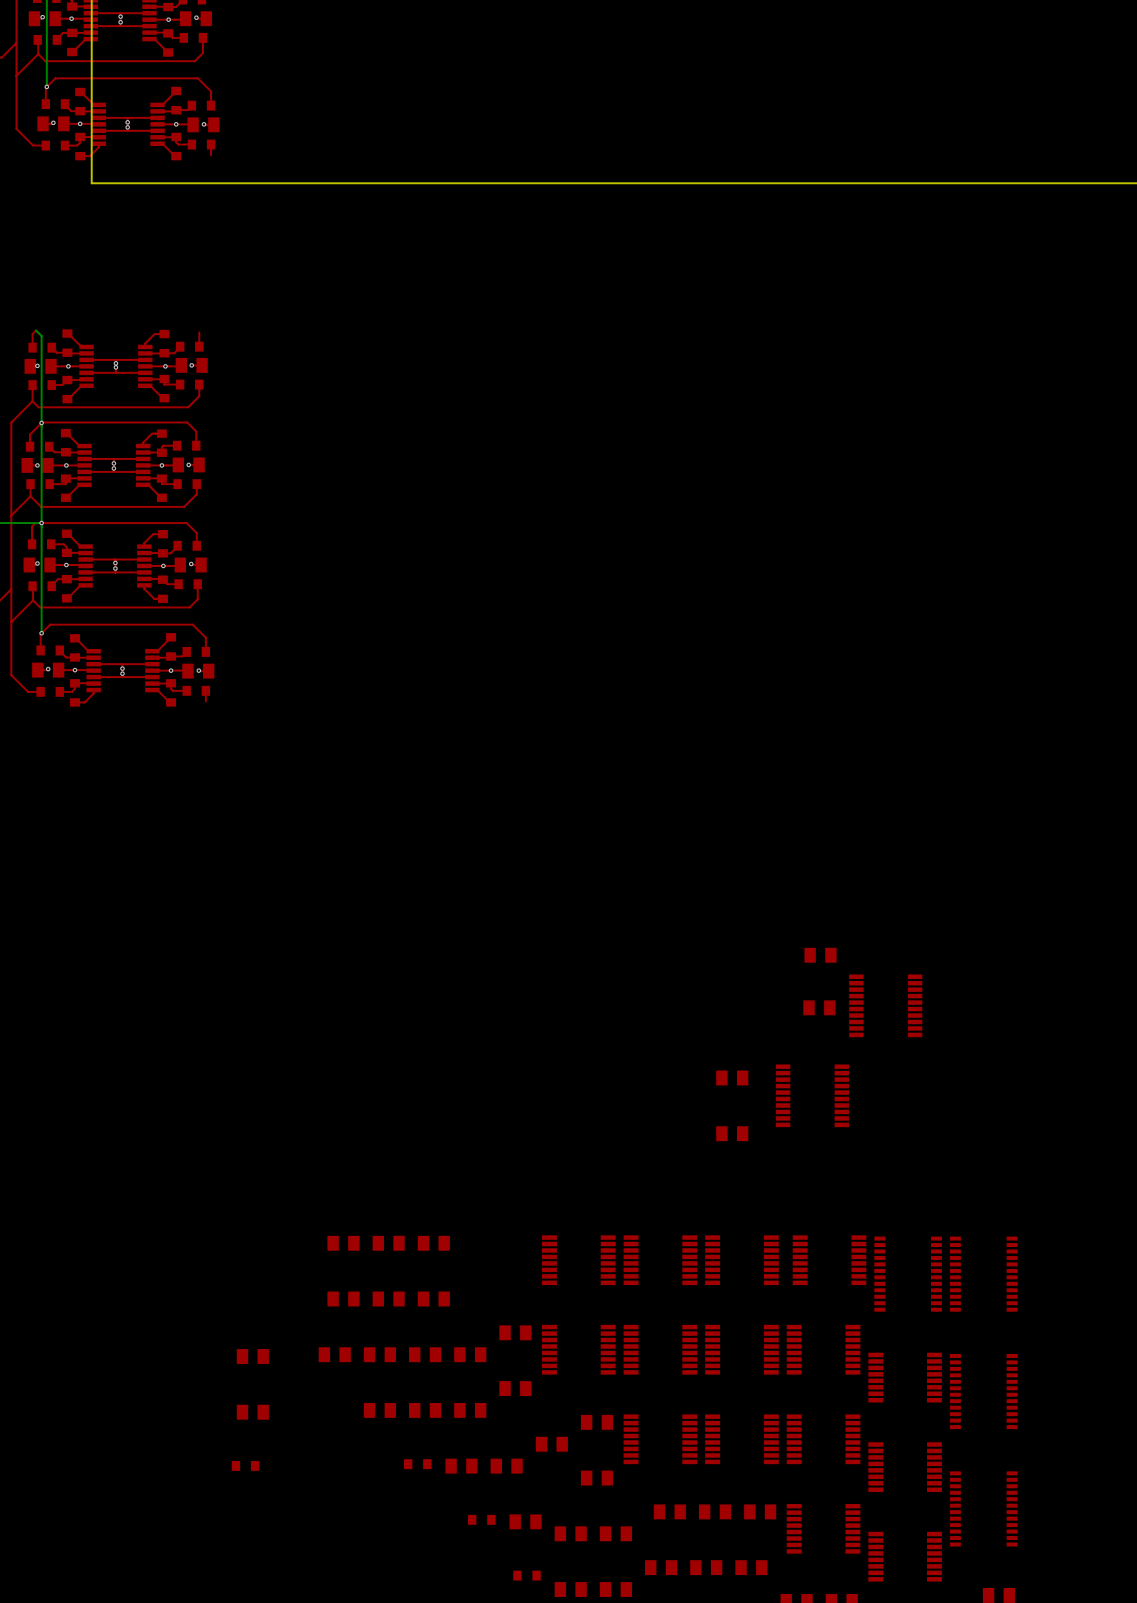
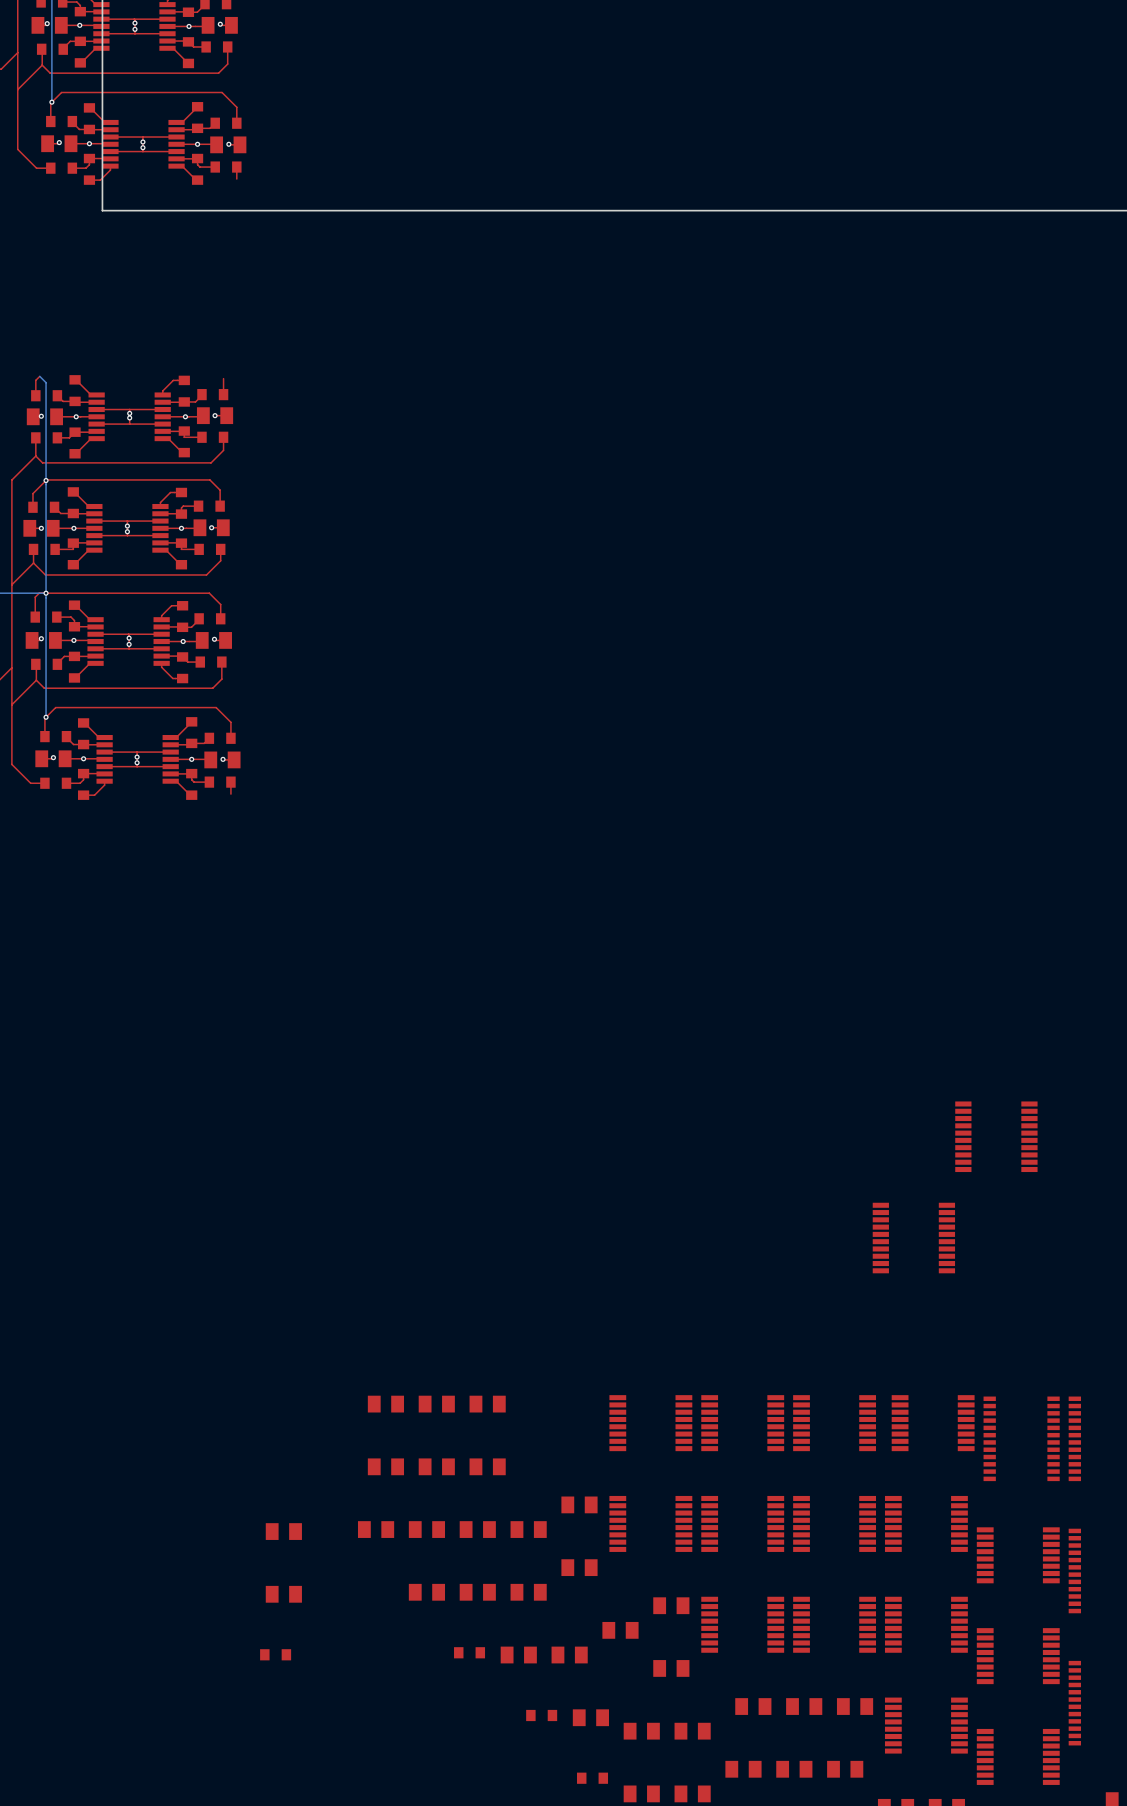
part: (820, 955) -> none
part: (819, 1007) -> none
part: (732, 1077) -> none
part: (732, 1133) -> none

